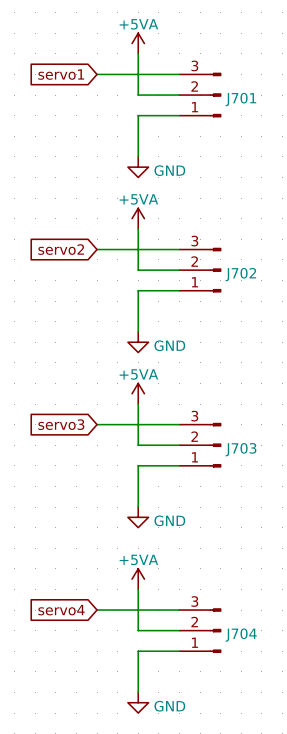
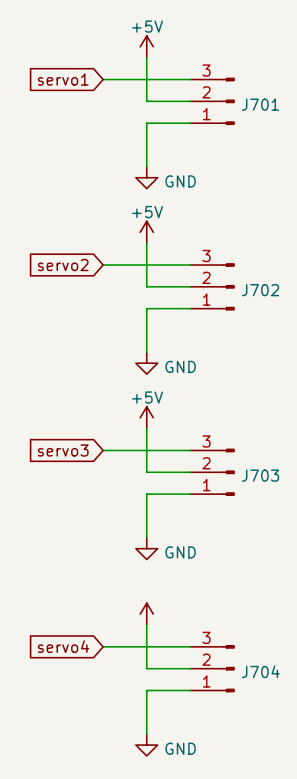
power symbol: +5VA (138, 43) -> +5V (146, 46)
power symbol: +5VA (138, 218) -> +5V (146, 232)
power symbol: +5VA (138, 393) -> +5V (146, 417)
power symbol text: +5VA (138, 559) -> none

